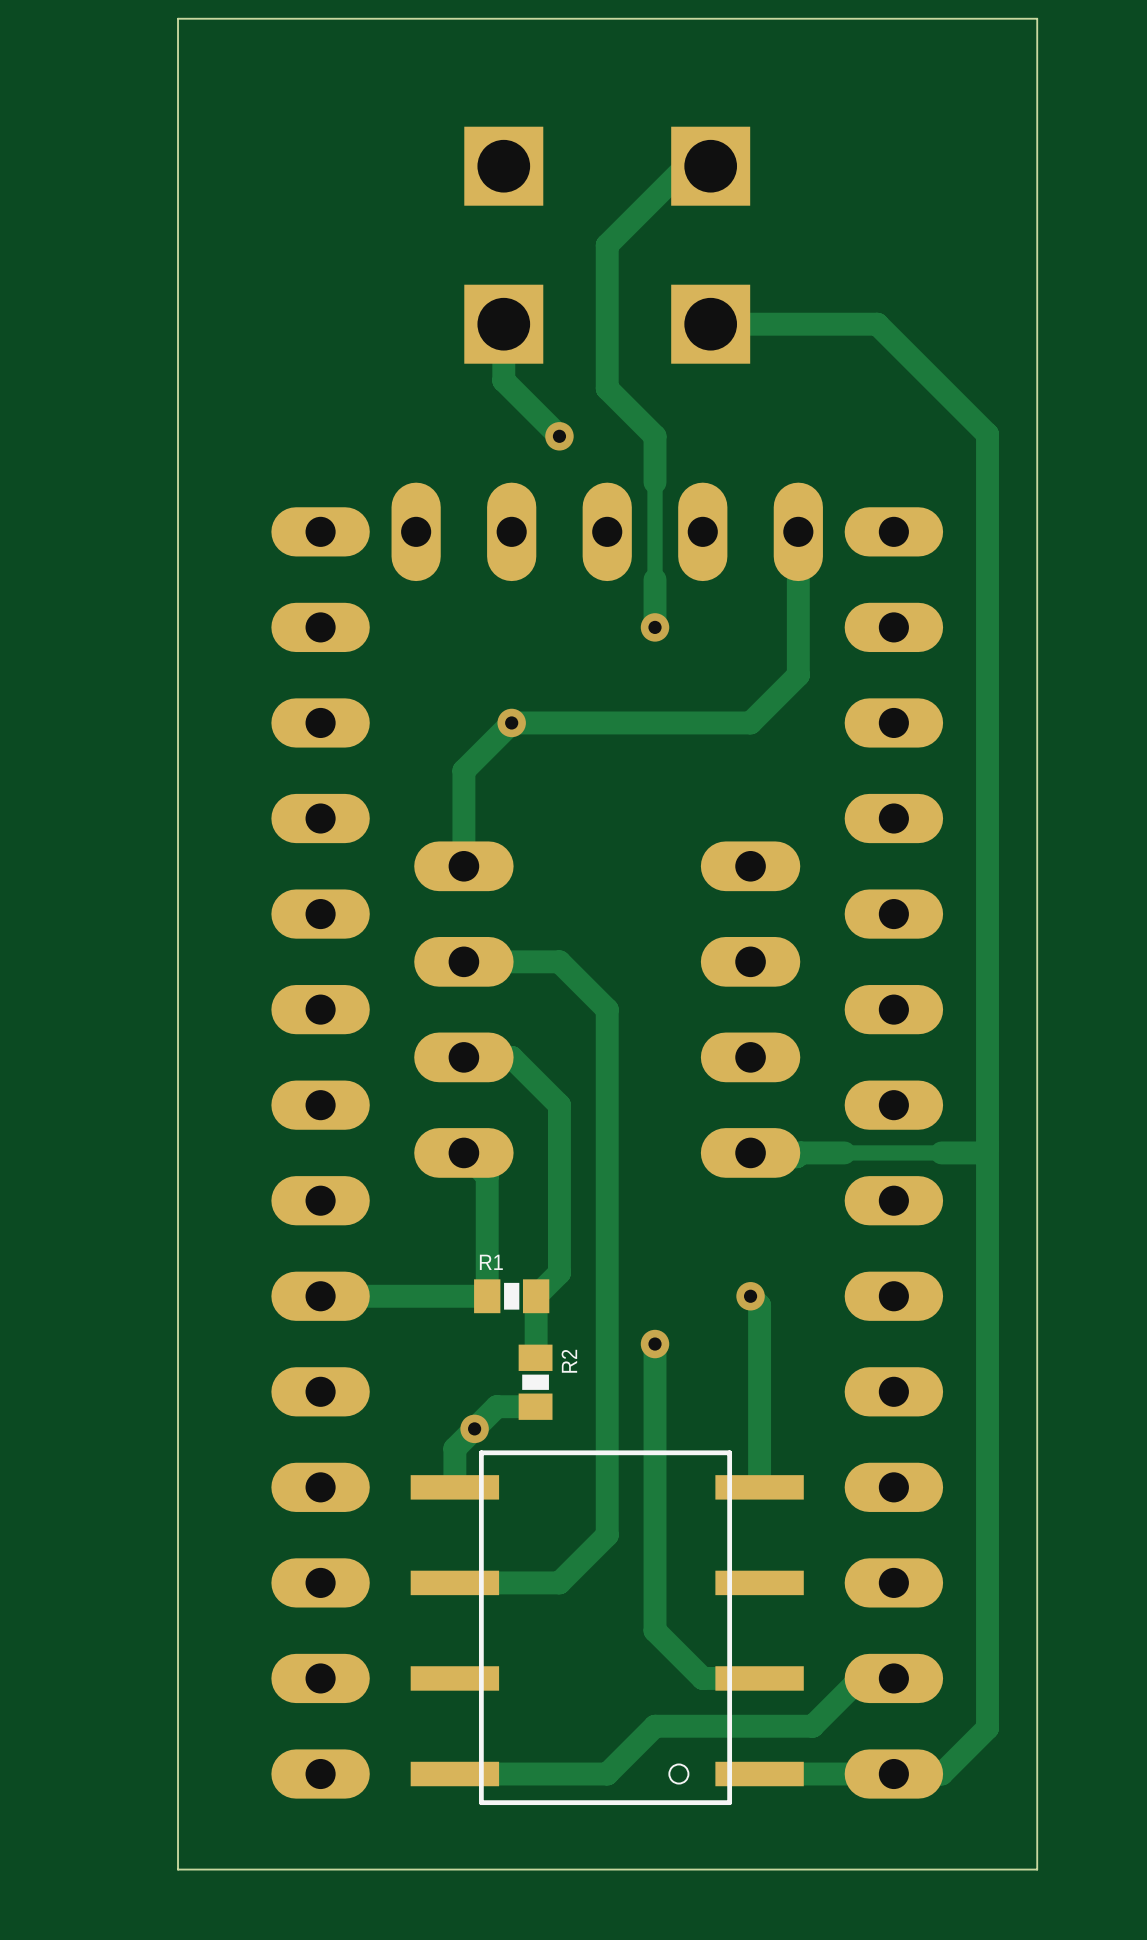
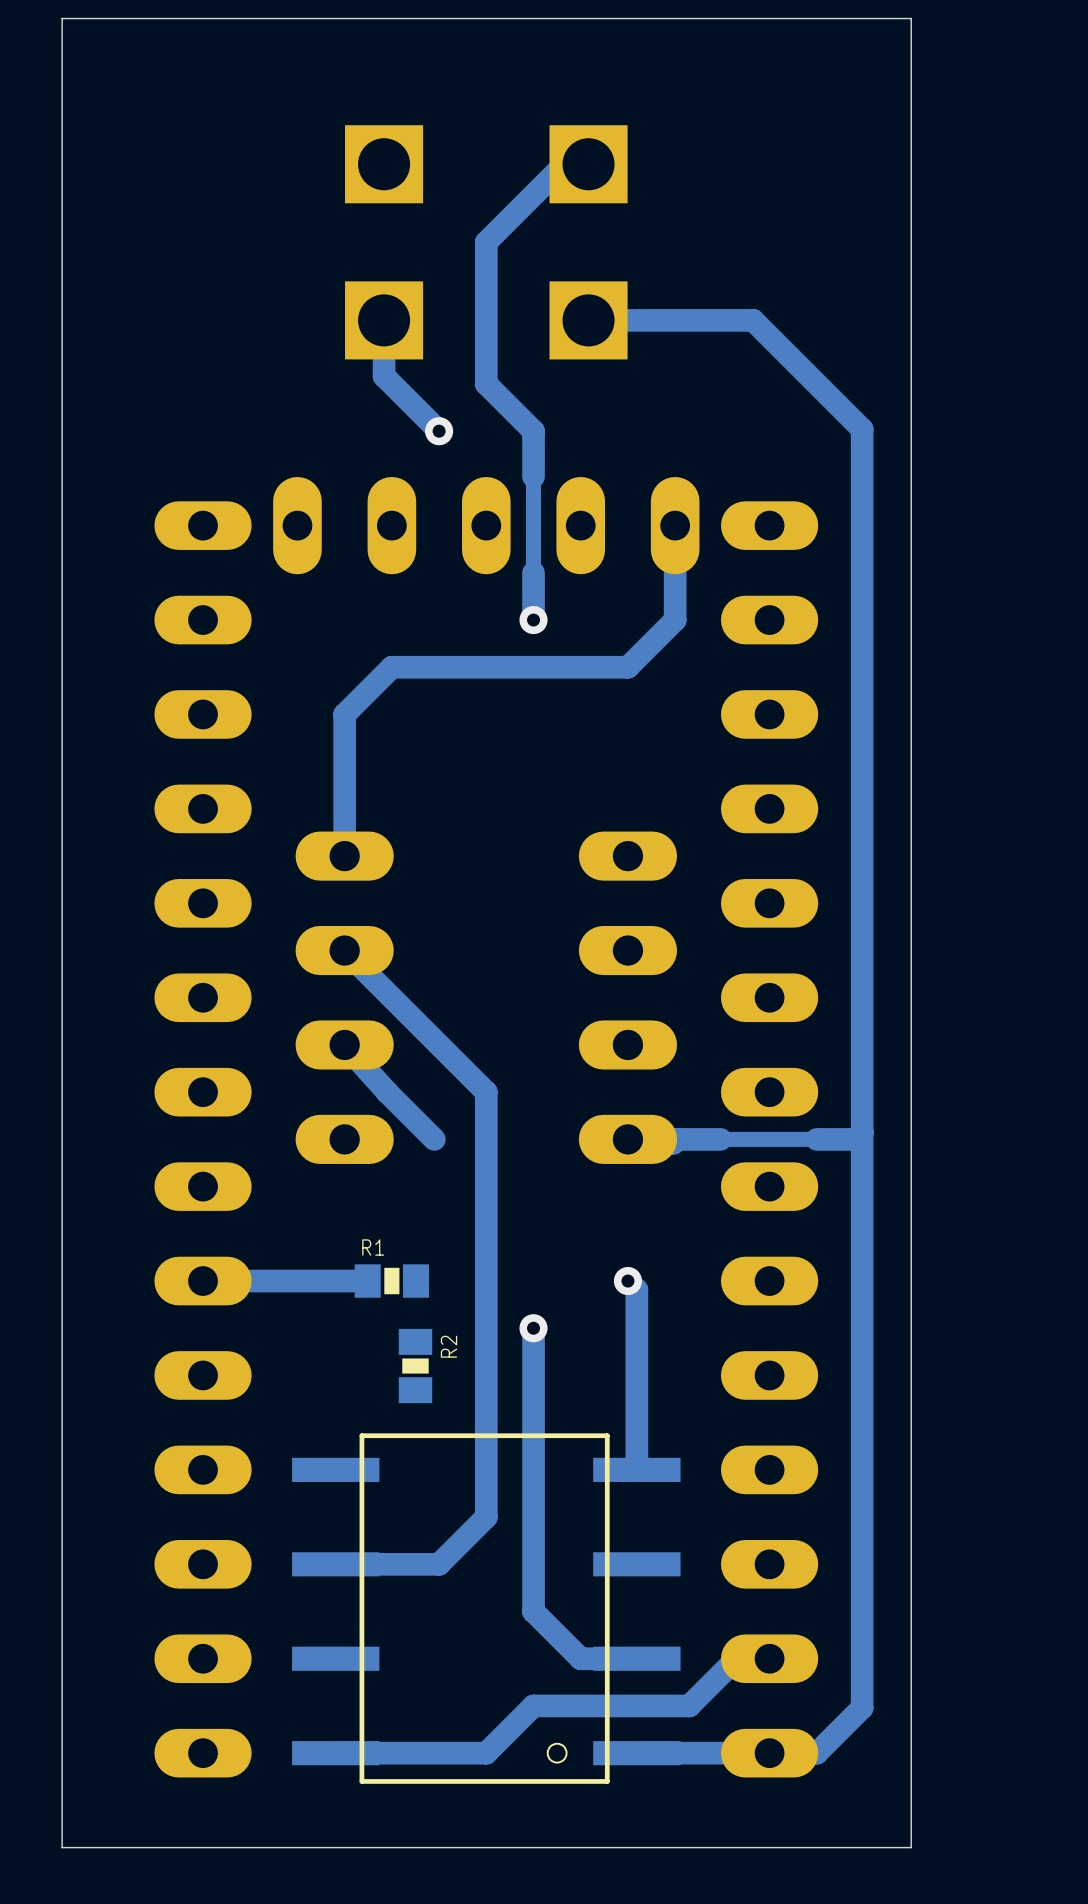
track: (798, 627) (798, 675) (750, 722) (511, 722) (463, 770) -> (675, 620) (627, 667) (391, 667) (344, 714) (344, 761)
via: (511, 722) -> none
track: (463, 961) (559, 961) (607, 1009) (607, 1105) -> (344, 950) (486, 1092)
track: (463, 1057) (511, 1057) (559, 1105) (559, 1272) (536, 1296) (535, 1357) -> (344, 1044) (387, 1092) (434, 1139)
track: (463, 1152) (487, 1176) (487, 1296) -> none
track: (535, 1406) (496, 1406) (454, 1448) (454, 1487) -> none
via: (474, 1428) -> none

